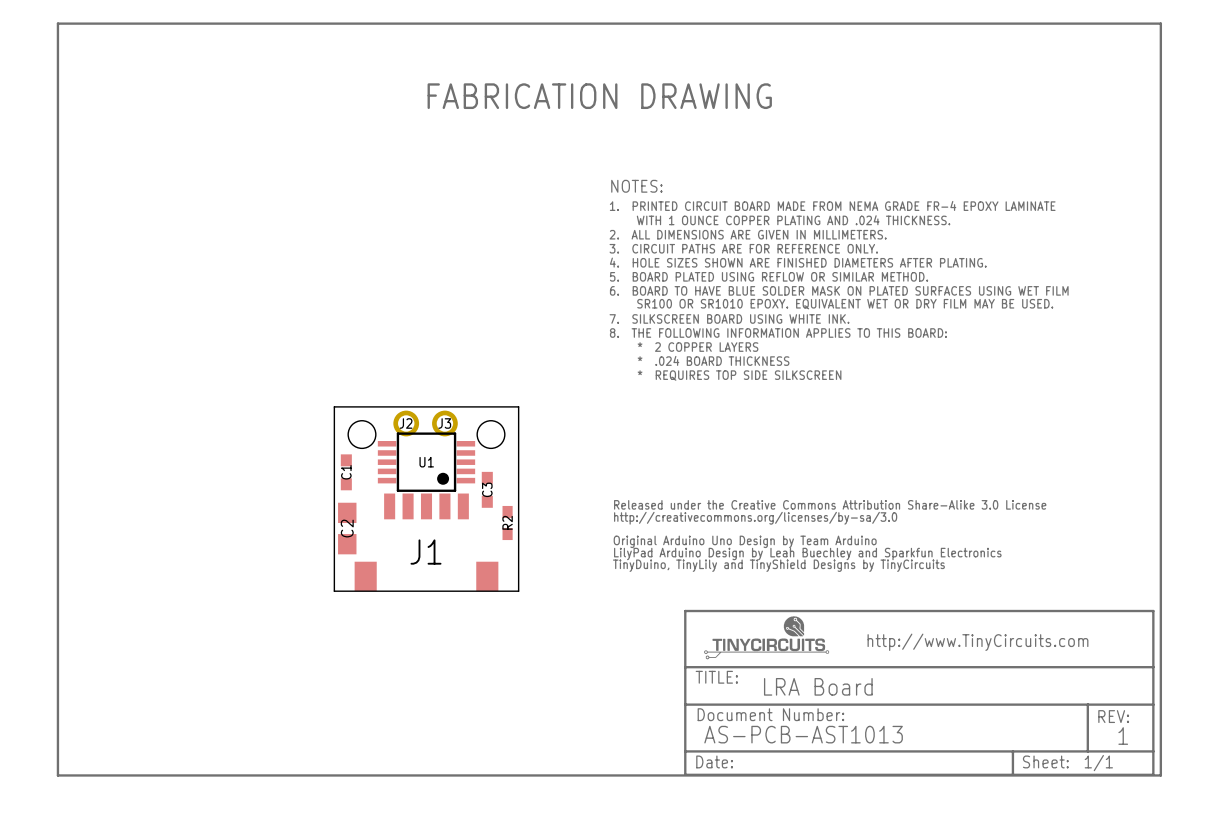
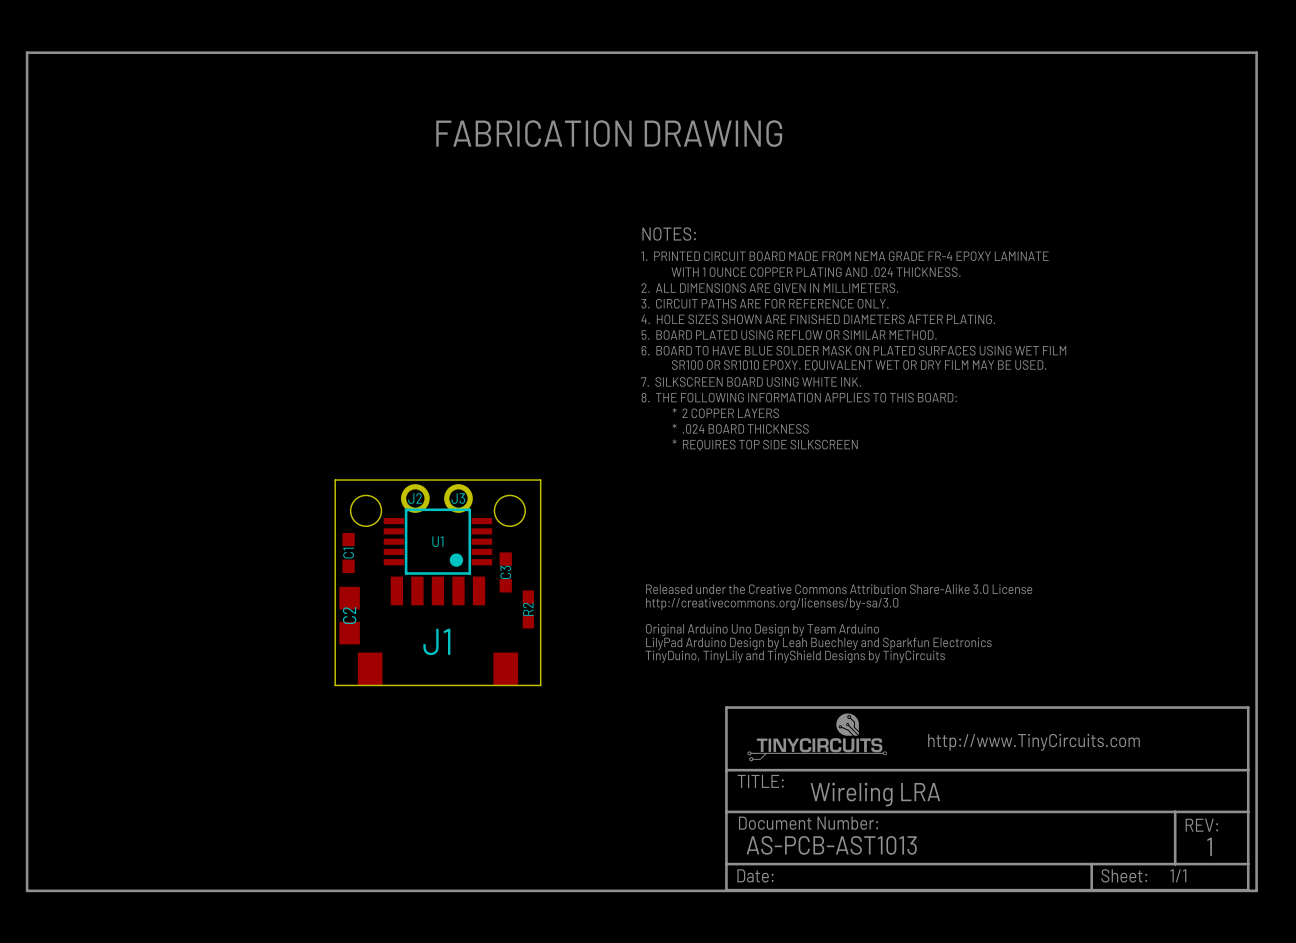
text: LRA Board (818, 686) -> Wireling LRA (875, 794)

